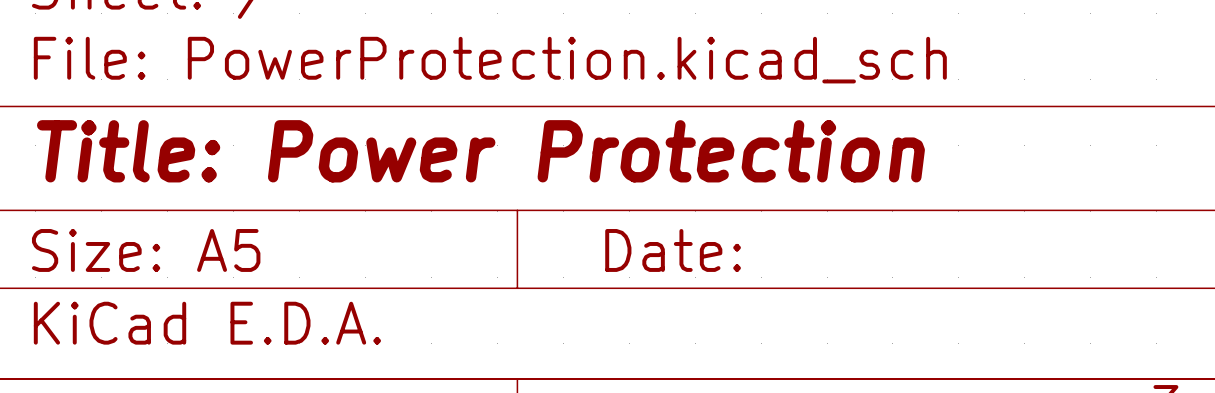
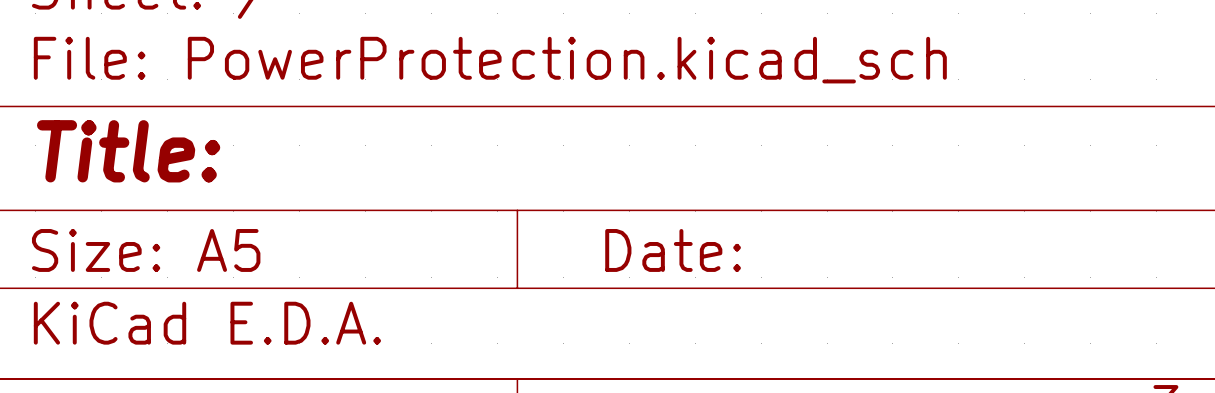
title block: Title: Power Protection (480, 151) -> Title: (128, 151)

